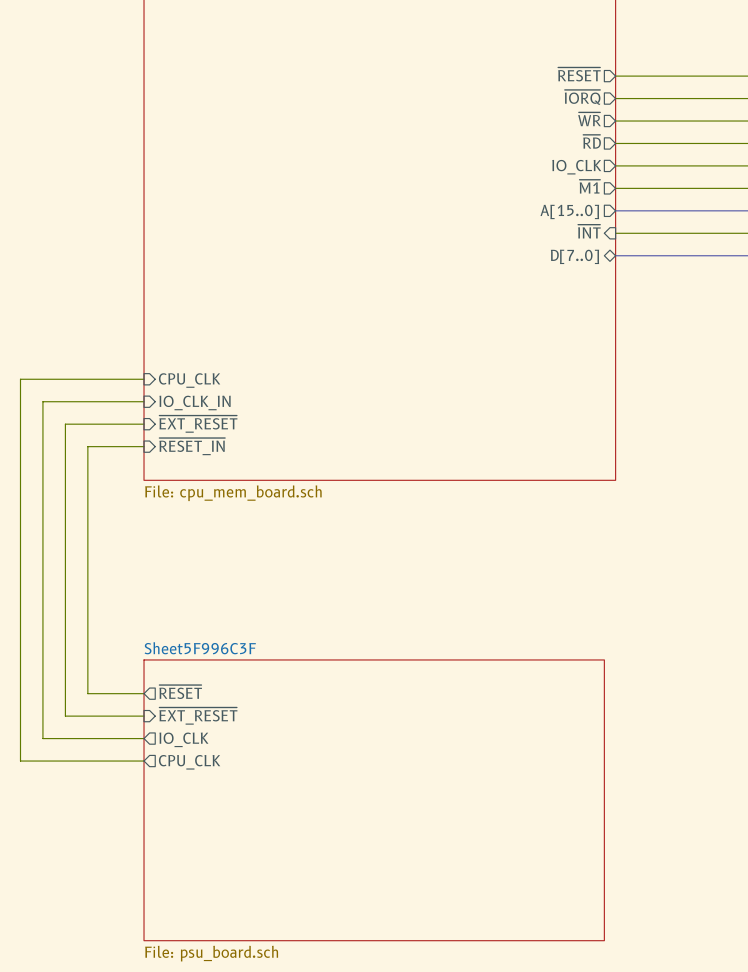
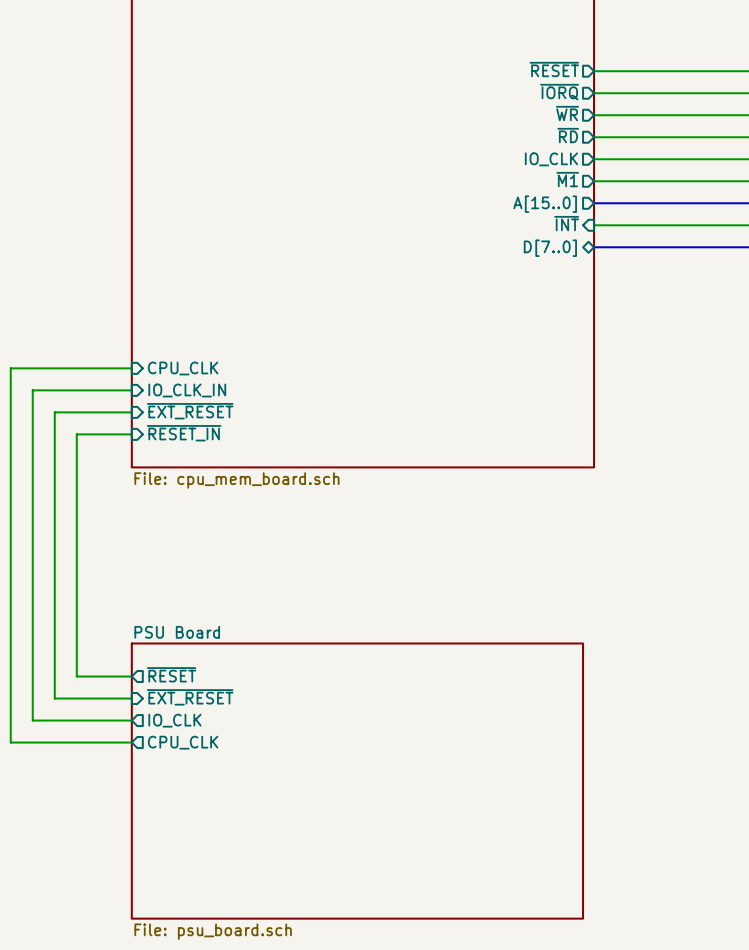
sheet Sheet5F996C3F name: Sheet5F996C3F (200, 648) -> PSU Board (177, 632)

